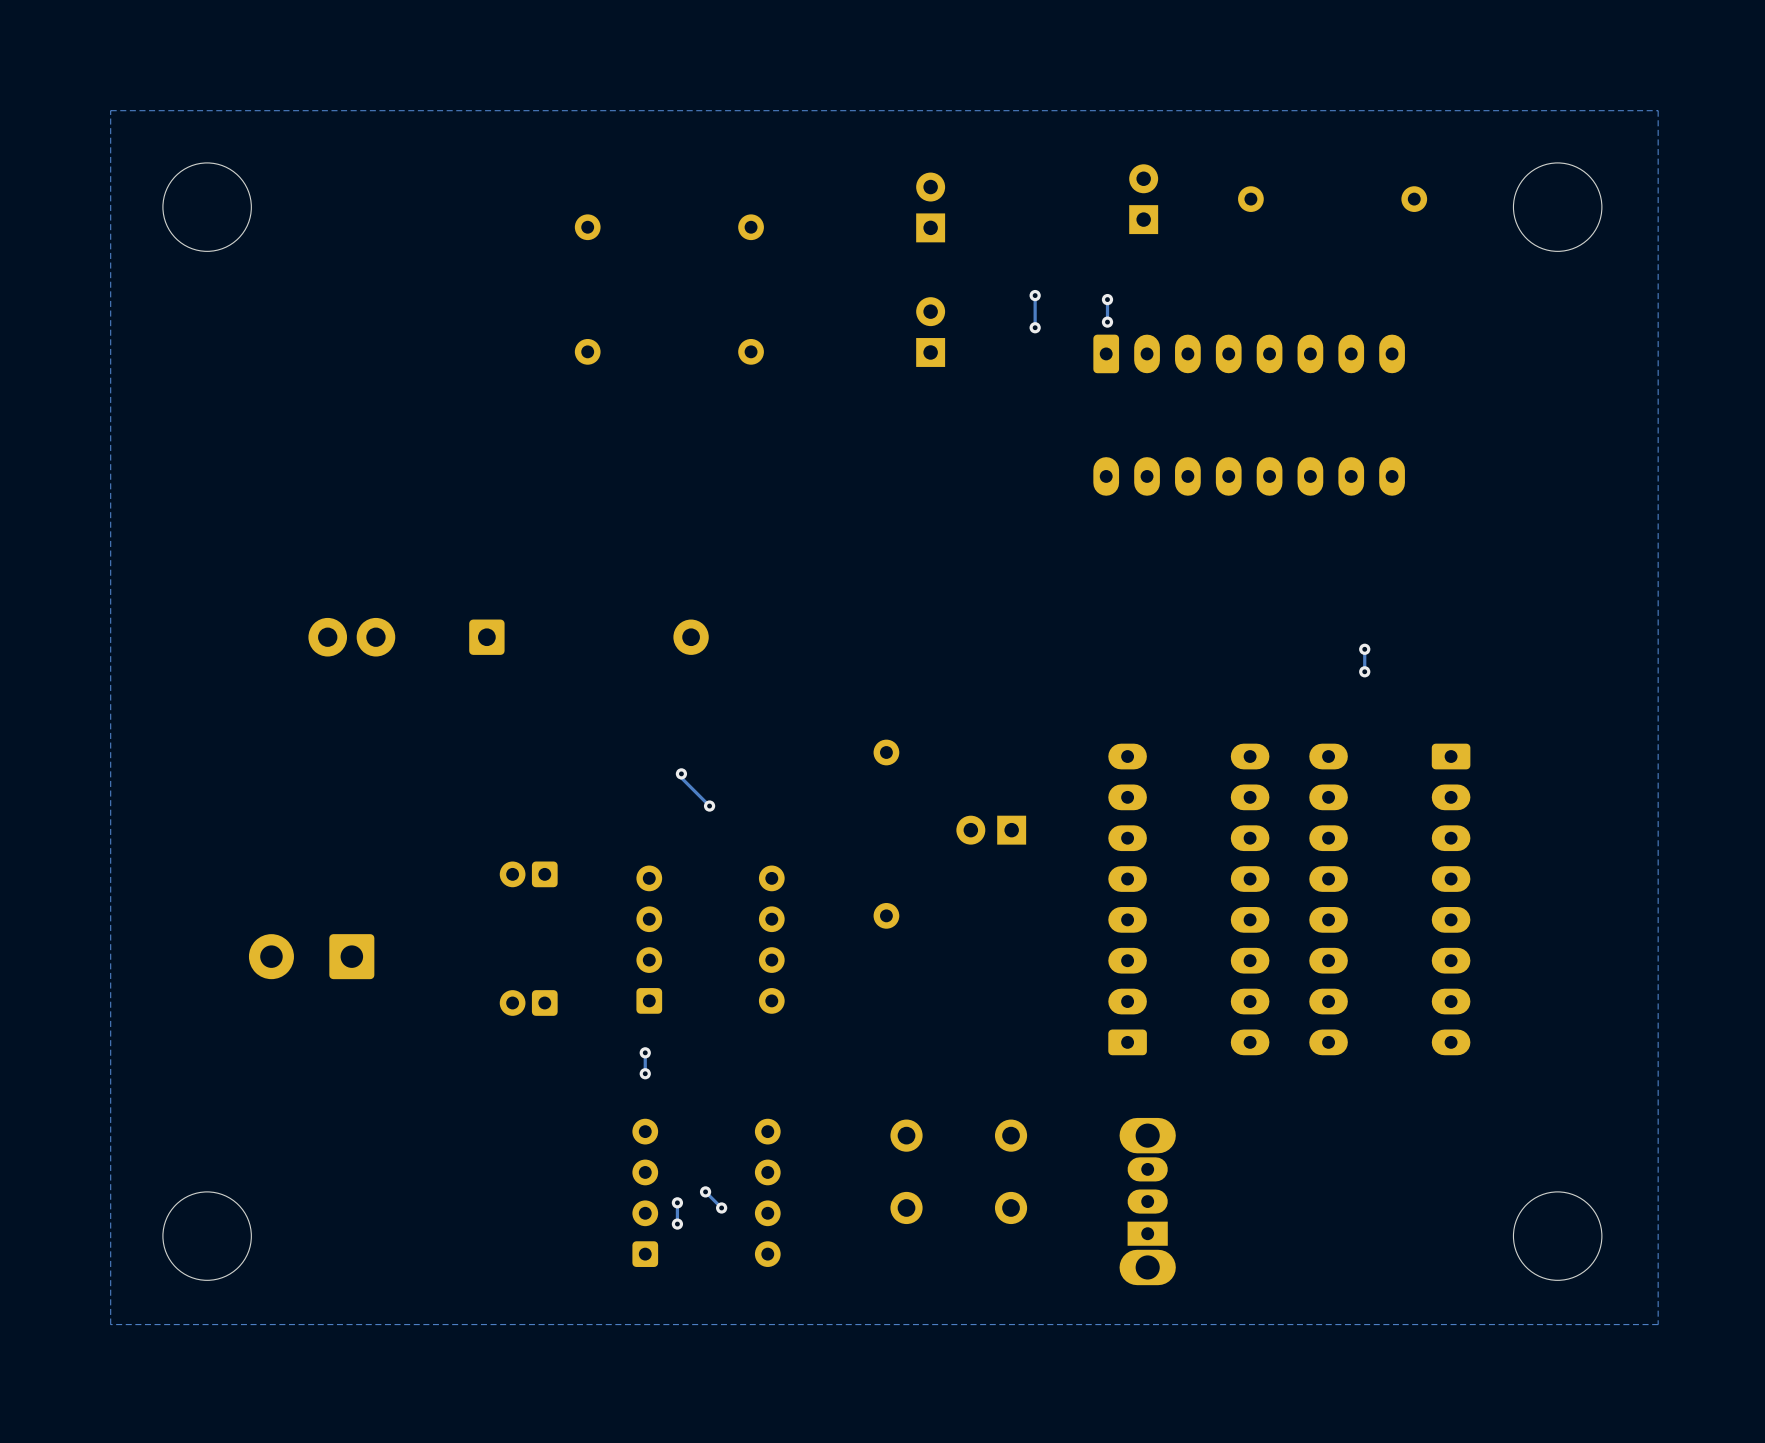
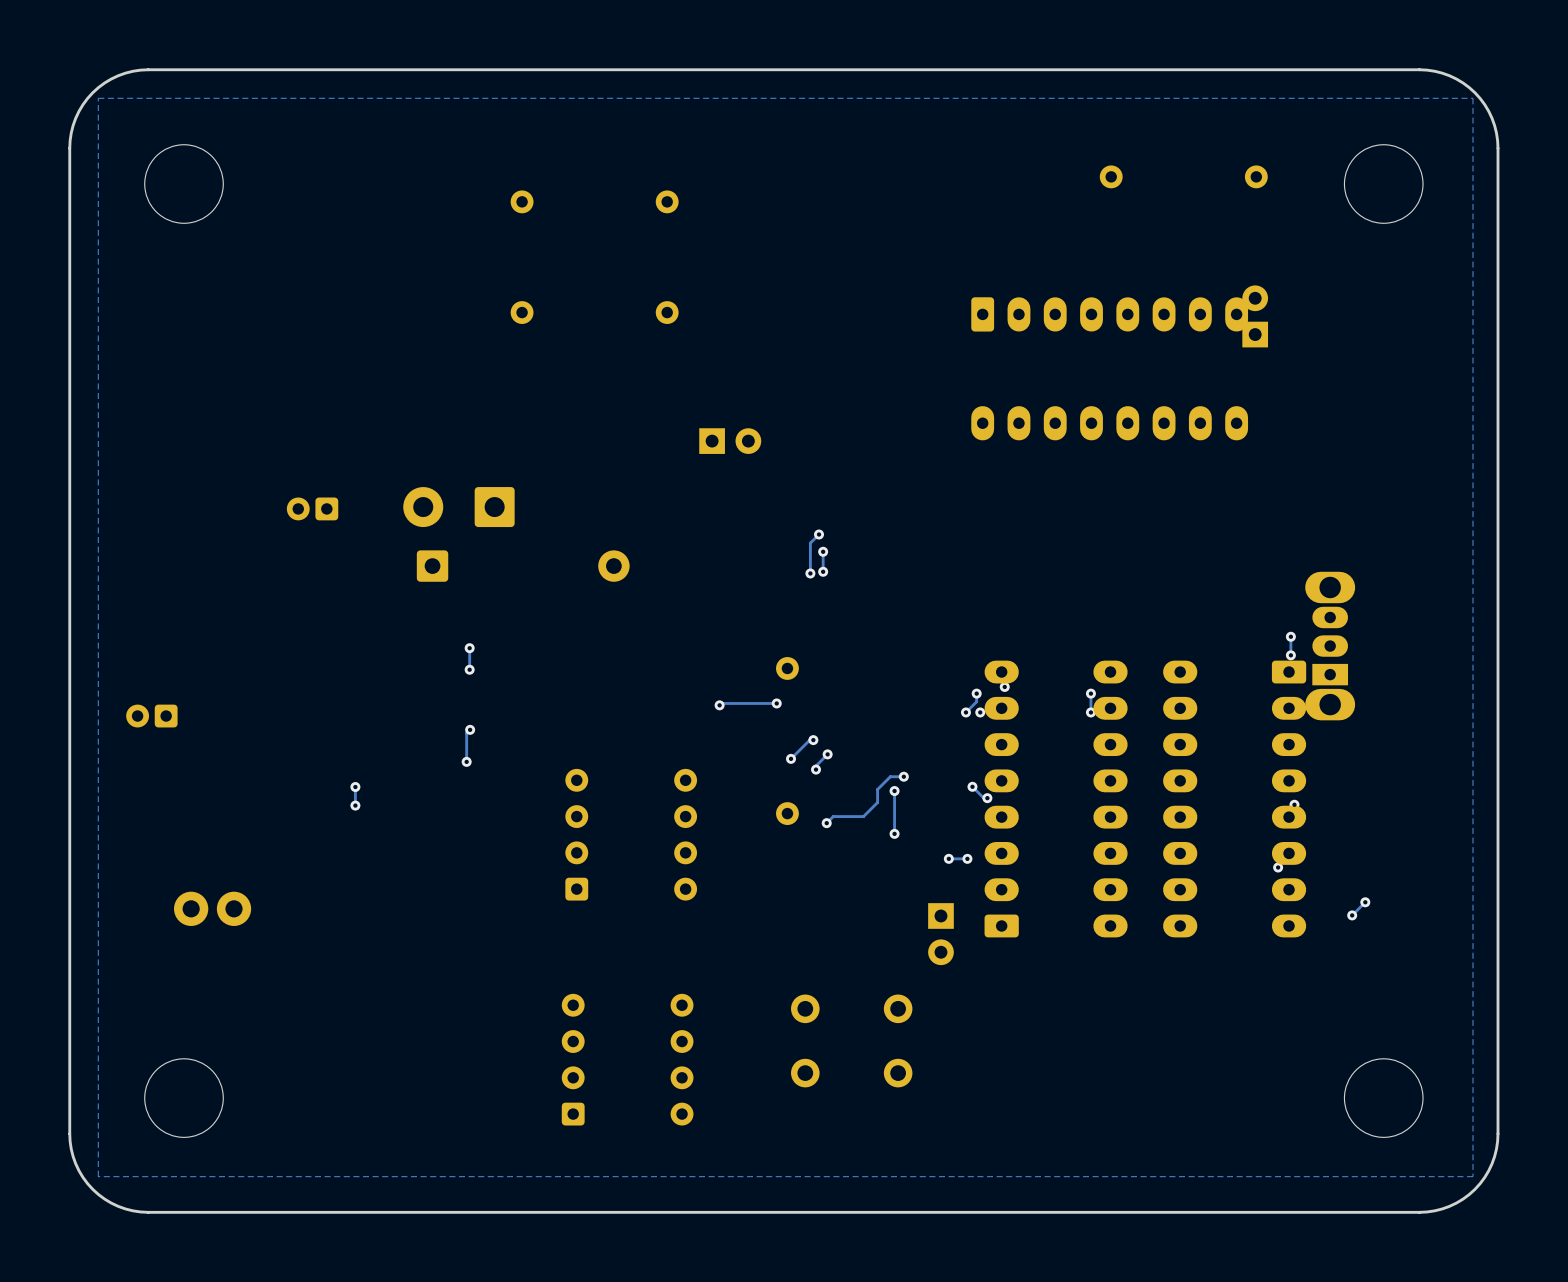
board edge: none -> (1419, 69) (148, 69) (125, 73) (111, 79) (98, 87) (87, 98) (75, 118) (71, 132) (69, 148) (69, 1133) (71, 1149) (75, 1163) (87, 1183) (104, 1199) (118, 1206) (132, 1210) (148, 1212) (1419, 1212) (1434, 1210) (1449, 1206) (1469, 1194) (1480, 1183) (1488, 1170) (1494, 1156) (1497, 1133) (1497, 148) (1496, 132) (1492, 118) (1484, 104) (1474, 92) (1463, 82) (1449, 75) (1434, 71) (1419, 69)
part: (1143, 199) -> none
part: (930, 207) -> none
track: (1035, 295) (1035, 327) -> none
via: (1035, 295) -> none
track: (1107, 299) (1107, 322) -> (823, 551) (823, 571)
via: (1107, 299) -> none
via: (1107, 322) -> none
via: (1035, 327) -> none
part: (930, 332) -> none
part: none -> (1255, 316)
part: none -> (730, 441)
part: none -> (458, 507)
part: none -> (312, 508)
track: none -> (819, 534) (810, 543) (810, 573)
via: none -> (819, 534)
via: none -> (823, 551)
part position: (351, 637) -> (212, 908)
via: none -> (823, 571)
via: none -> (810, 573)
track: (1364, 649) (1364, 671) -> none
via: (1364, 649) -> none
via: (1364, 671) -> none
track: none -> (1290, 636) (1290, 655)
via: none -> (1290, 636)
part: none -> (1330, 646)
track: none -> (469, 648) (469, 669)
via: none -> (469, 648)
via: none -> (1290, 655)
via: none -> (469, 669)
track: (681, 773) (681, 777) (709, 806) -> none
via: (681, 773) -> none
via: none -> (1004, 686)
track: none -> (976, 693) (976, 701) (965, 712)
via: none -> (976, 693)
track: none -> (1090, 693) (1090, 712)
via: none -> (1090, 693)
track: none -> (776, 703) (721, 703) (719, 705)
via: none -> (776, 703)
via: none -> (719, 705)
via: none -> (965, 712)
via: none -> (980, 712)
via: none -> (1090, 712)
part: none -> (151, 716)
via: (709, 806) -> none
track: none -> (470, 729) (466, 733) (466, 761)
via: none -> (470, 729)
part: (991, 830) -> none
track: none -> (813, 740) (809, 740) (791, 758)
via: none -> (813, 740)
track: none -> (827, 754) (816, 766) (816, 769)
via: none -> (827, 754)
via: none -> (791, 758)
via: none -> (466, 761)
via: none -> (816, 769)
part: (528, 874) -> none
track: none -> (903, 776) (890, 776) (877, 789) (877, 802) (863, 816) (833, 816) (826, 823)
via: none -> (903, 776)
via: none -> (355, 787)
track: none -> (972, 786) (983, 798) (987, 798)
via: none -> (972, 786)
track: none -> (894, 791) (894, 833)
via: none -> (894, 791)
via: none -> (987, 798)
via: none -> (1294, 804)
via: none -> (355, 805)
via: none -> (826, 823)
via: none -> (894, 833)
part: (311, 956) -> none
via: none -> (948, 858)
track: none -> (967, 858) (948, 858)
via: none -> (967, 858)
via: none -> (1278, 867)
part: (528, 1002) -> none
track: none -> (1365, 902) (1352, 915)
via: none -> (1365, 902)
via: none -> (1352, 915)
part: none -> (940, 934)
track: (645, 1052) (645, 1073) -> (355, 787) (355, 805)
via: (645, 1052) -> none
via: (645, 1073) -> none
track: (705, 1191) (721, 1207) -> none
via: (705, 1191) -> none
part: (1147, 1201) -> none
track: (677, 1202) (677, 1224) -> none
via: (677, 1202) -> none
via: (721, 1207) -> none
via: (677, 1224) -> none

